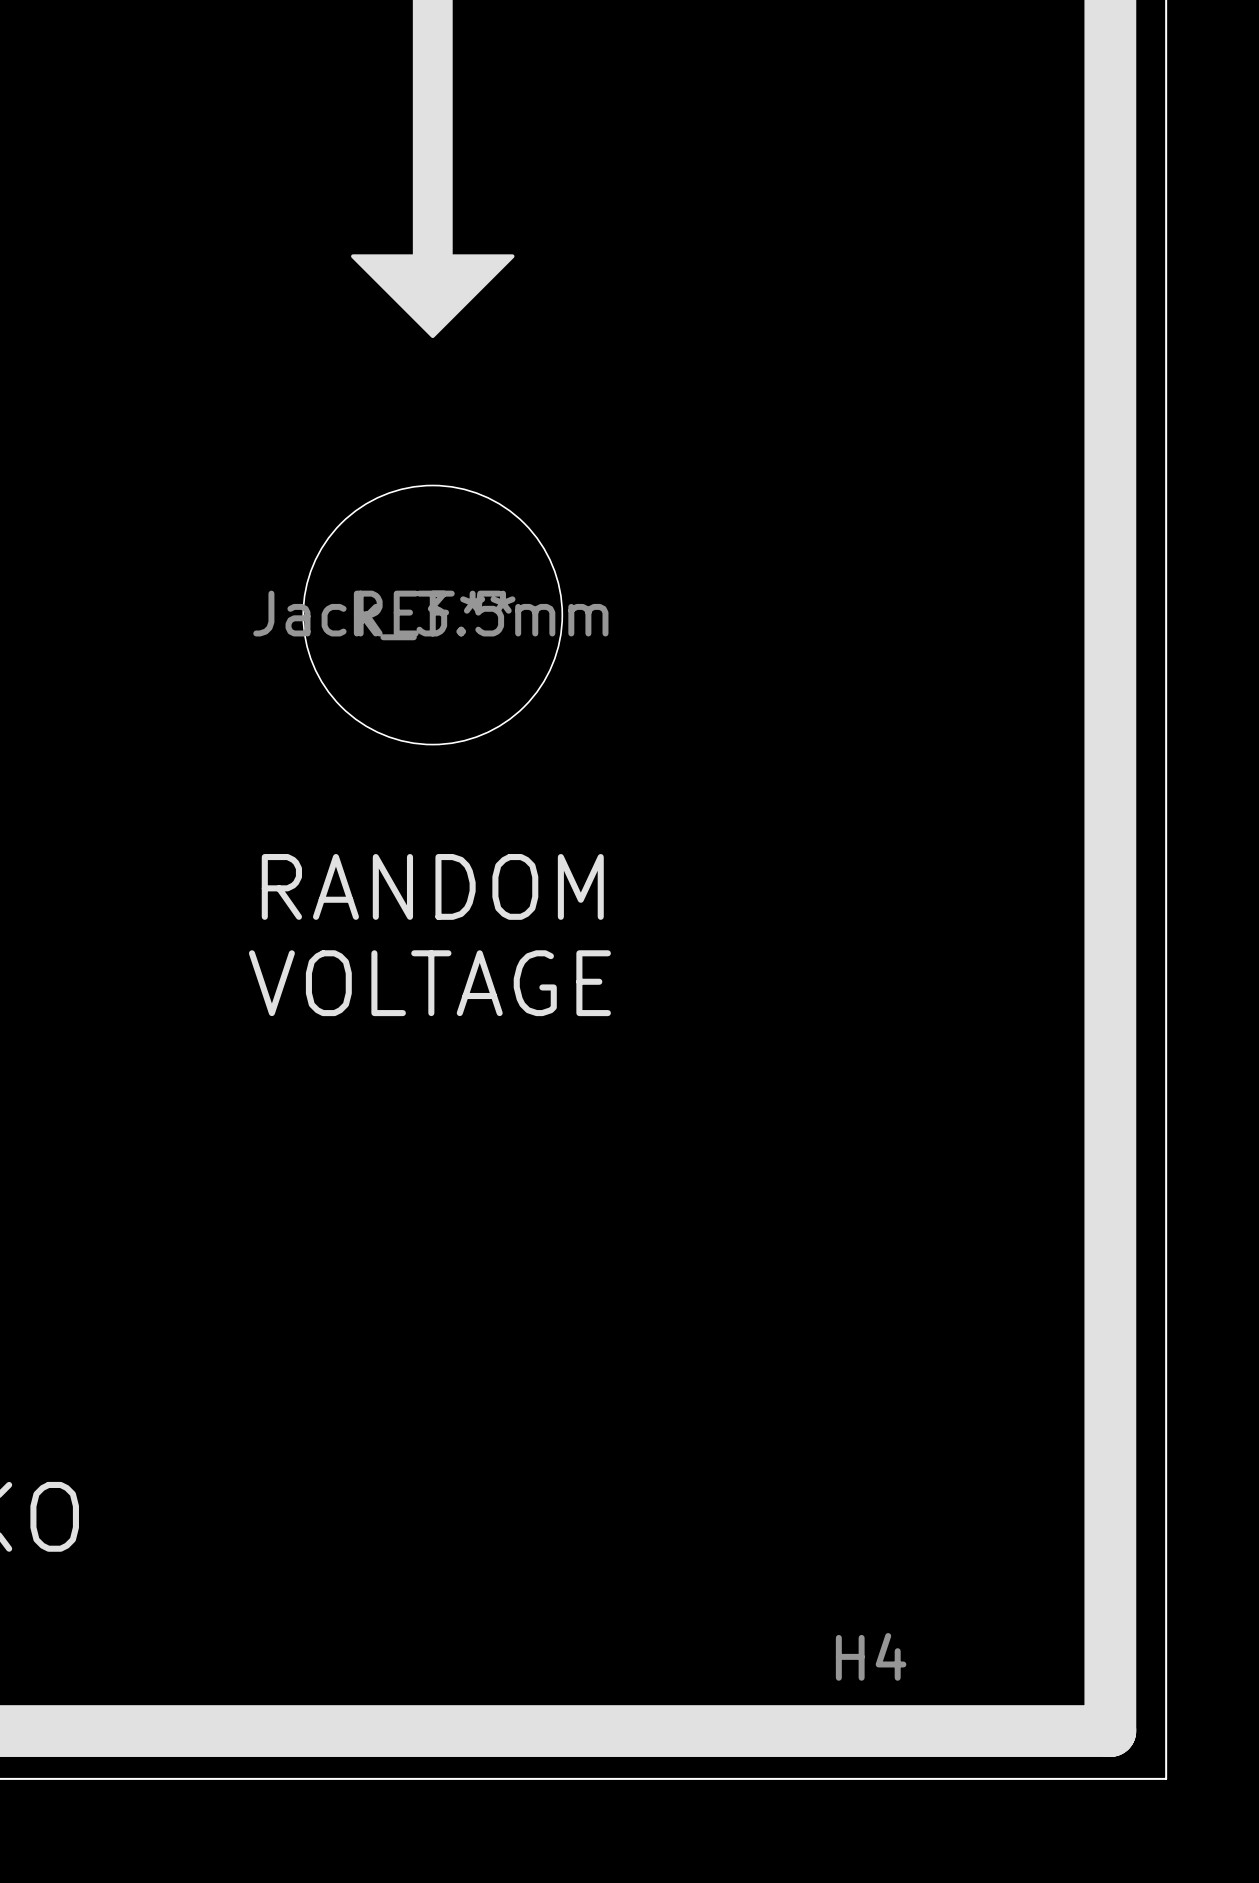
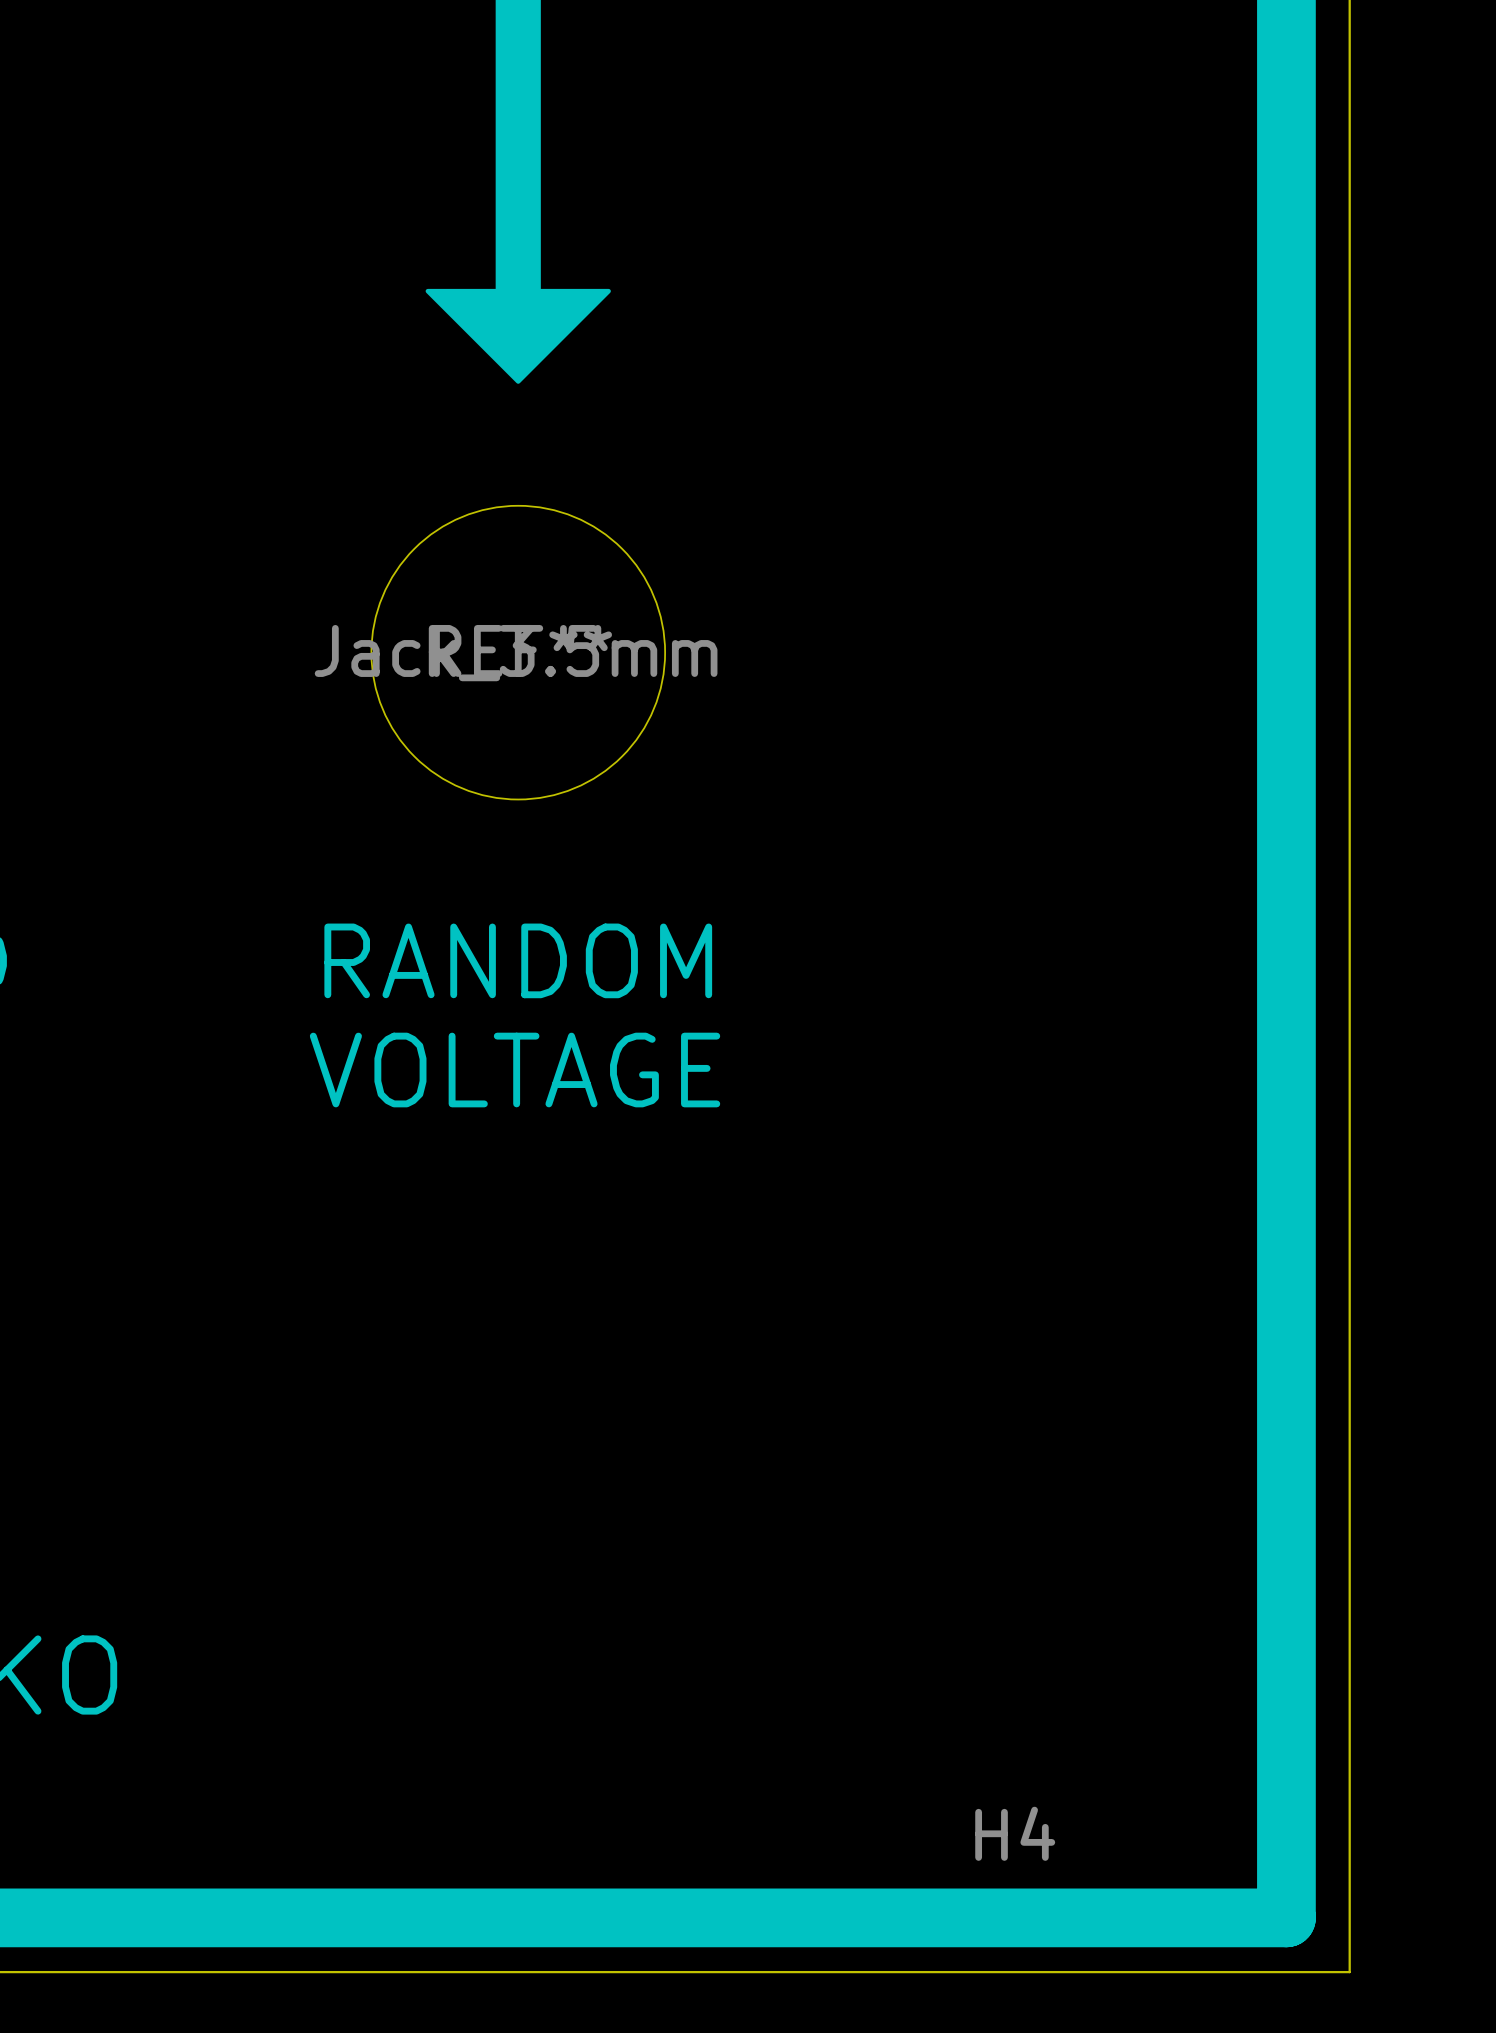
drawing position: (432, 296) -> (518, 336)

